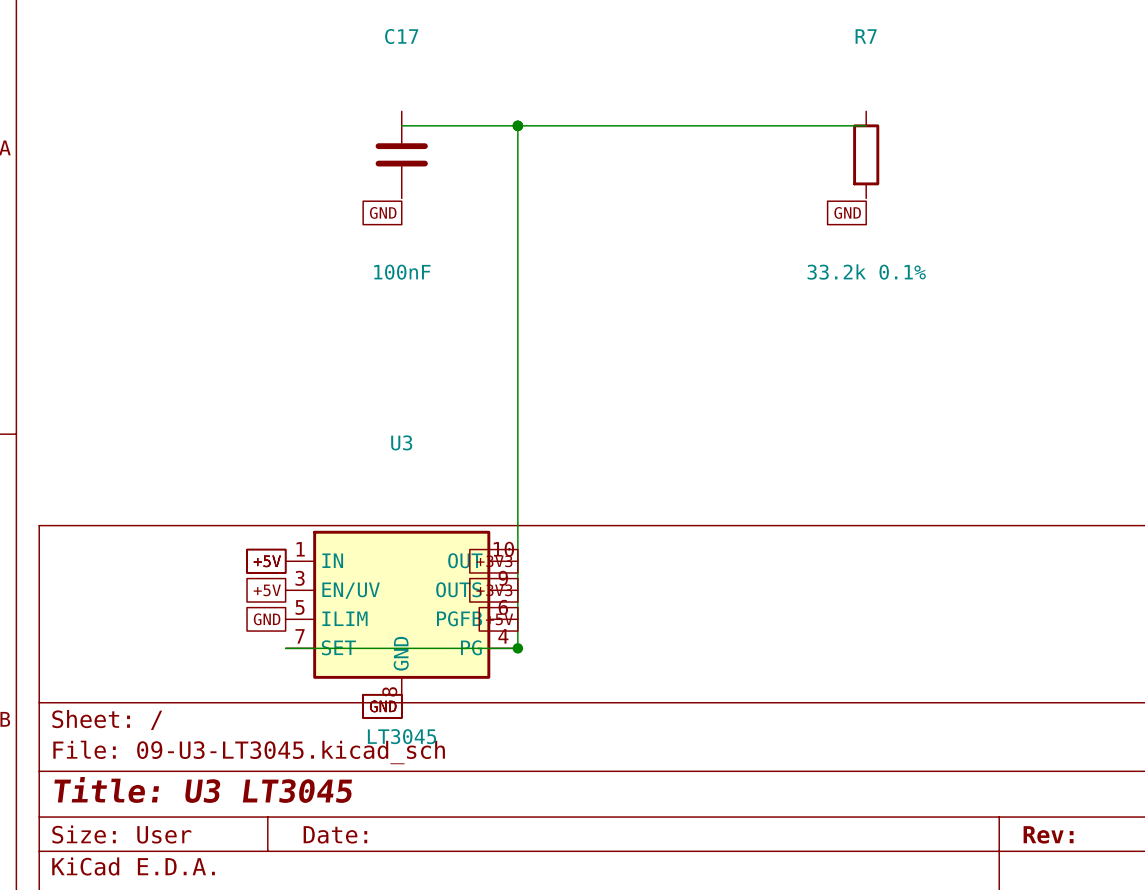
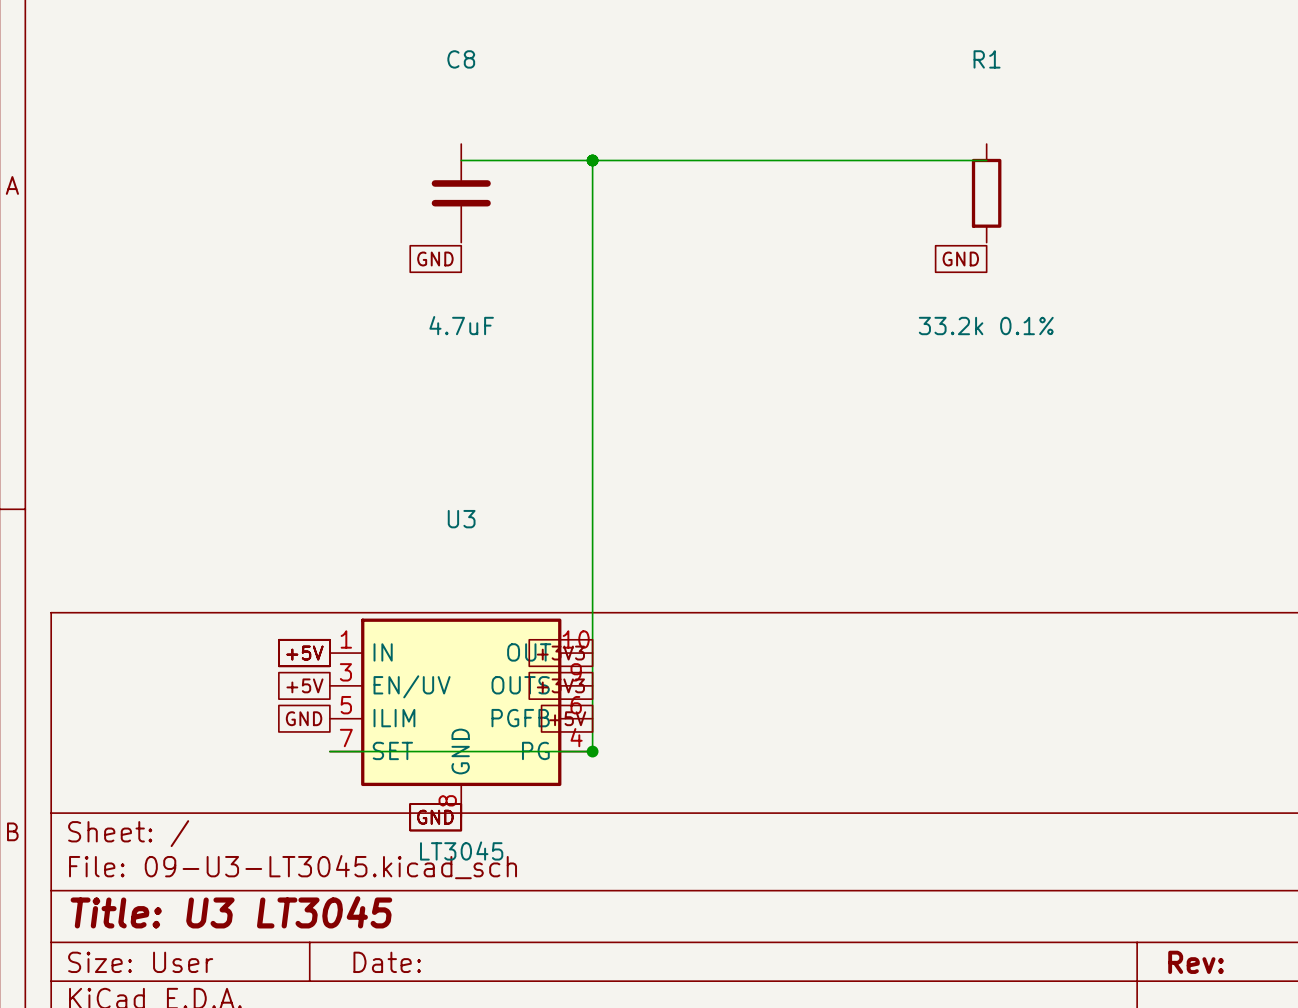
C17 name: C17 (401, 36) -> C8 (461, 59)
R7 name: R7 (866, 36) -> R1 (987, 59)
C17 value: 100nF (402, 272) -> 4.7uF (461, 325)

